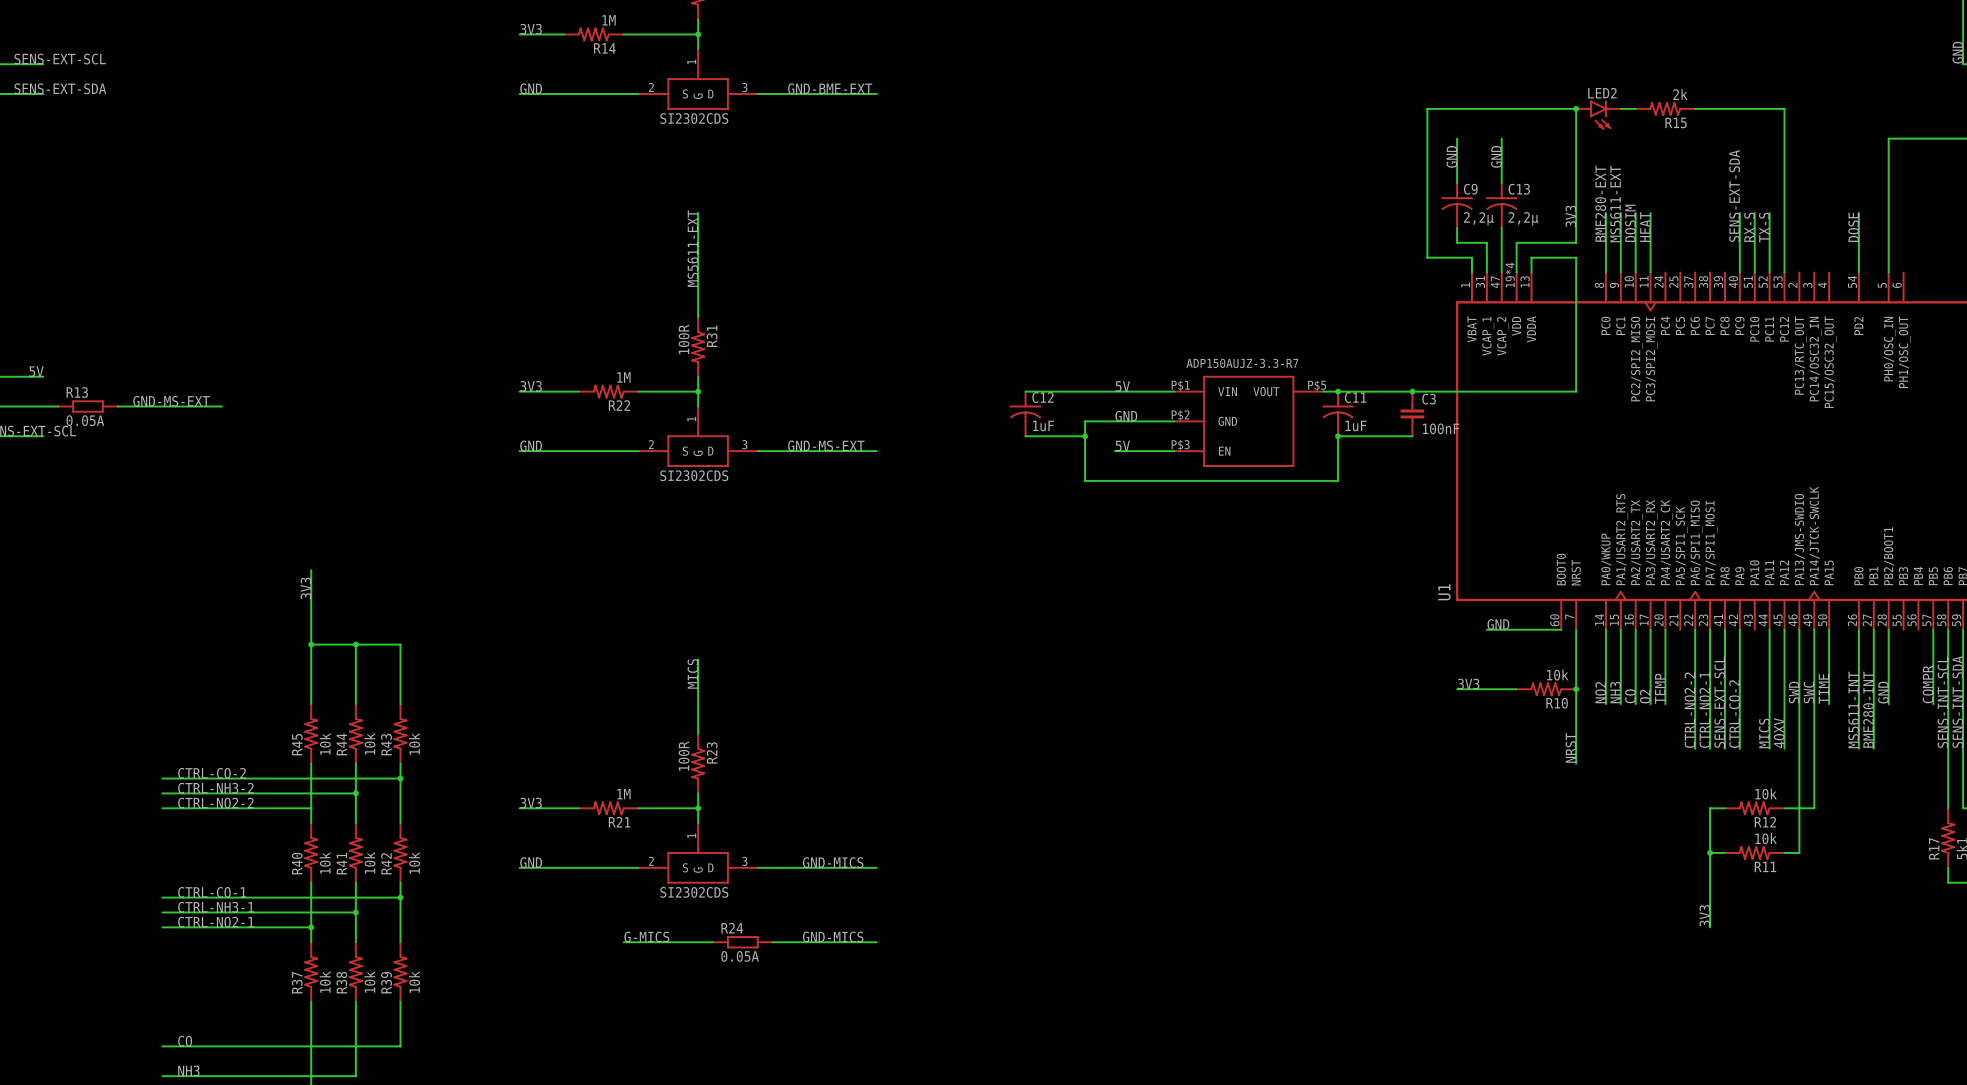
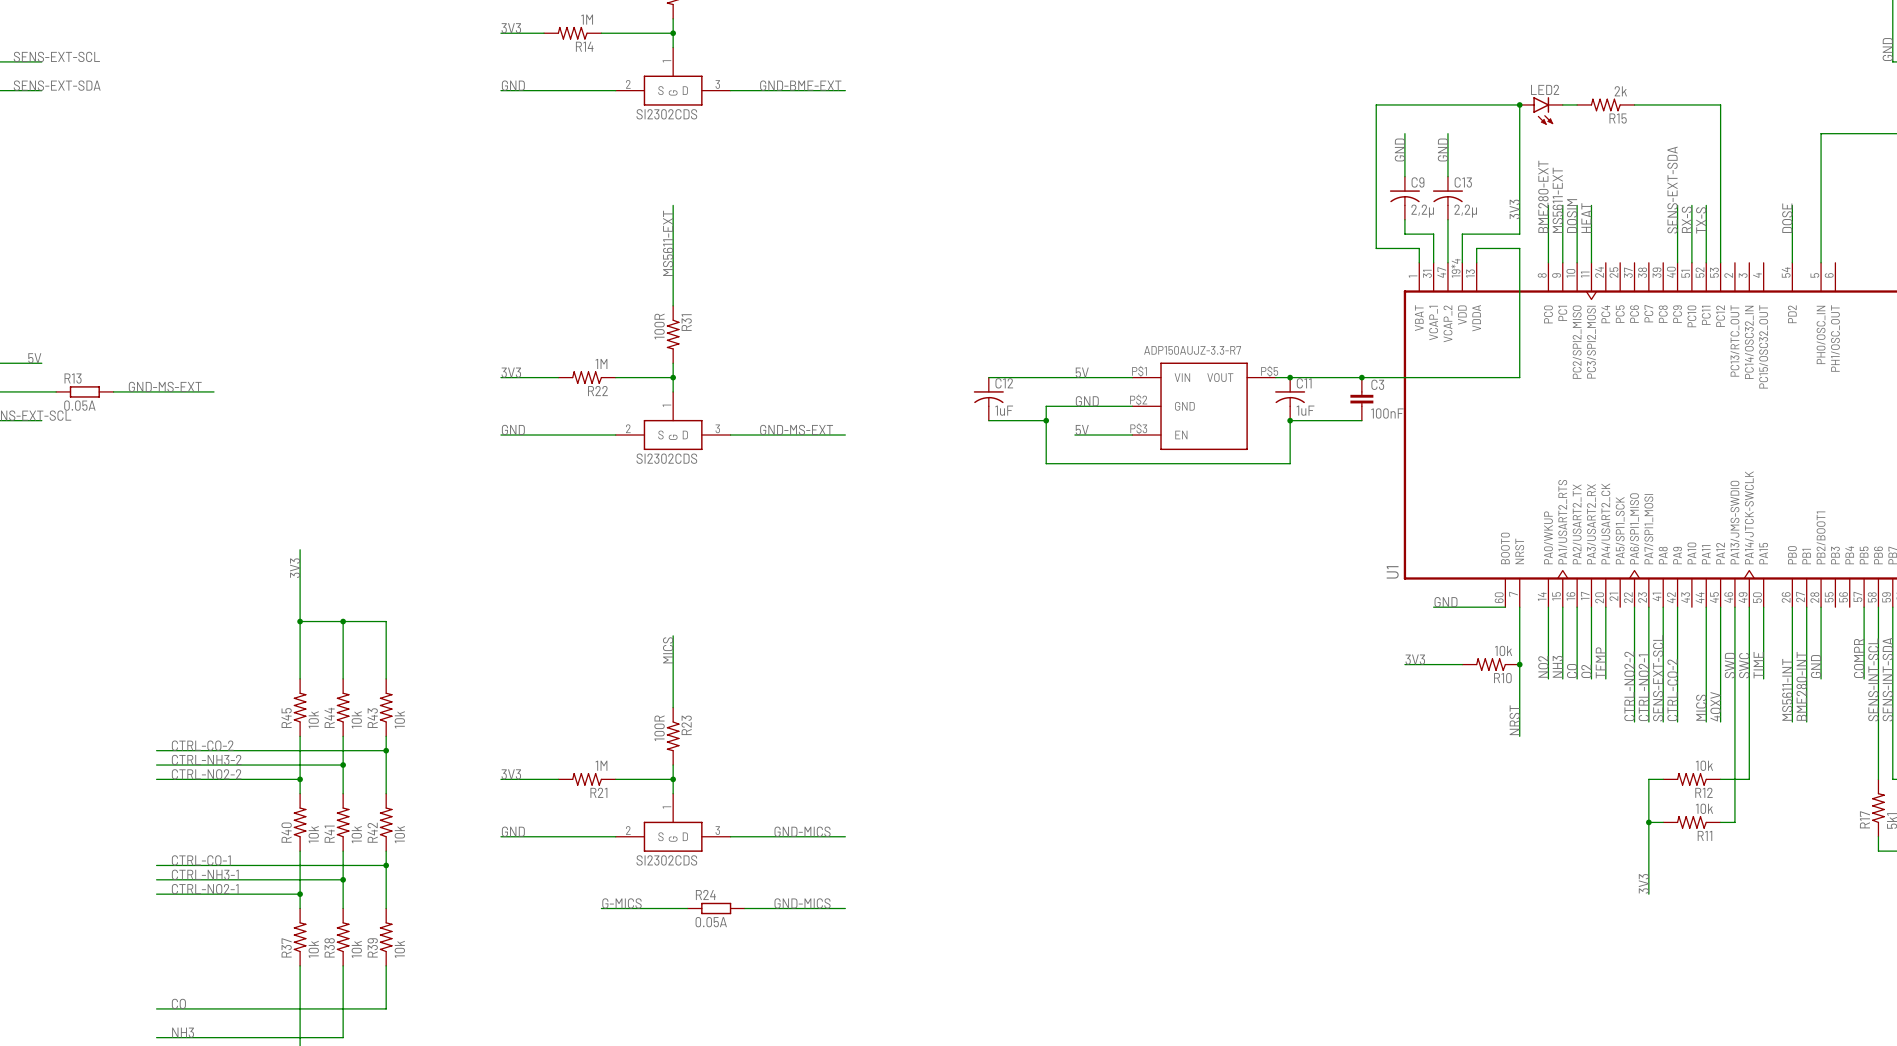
junction: none -> (300, 779)

